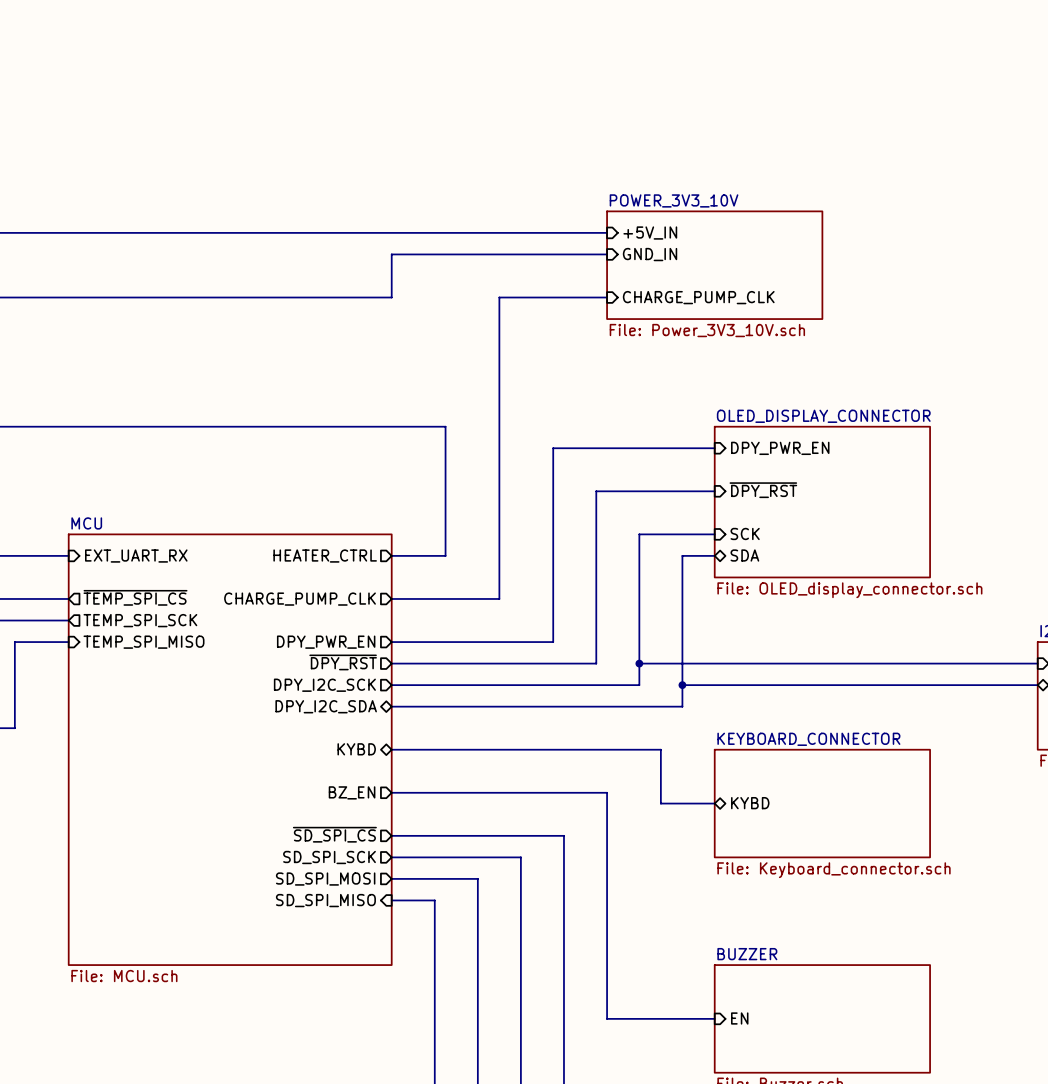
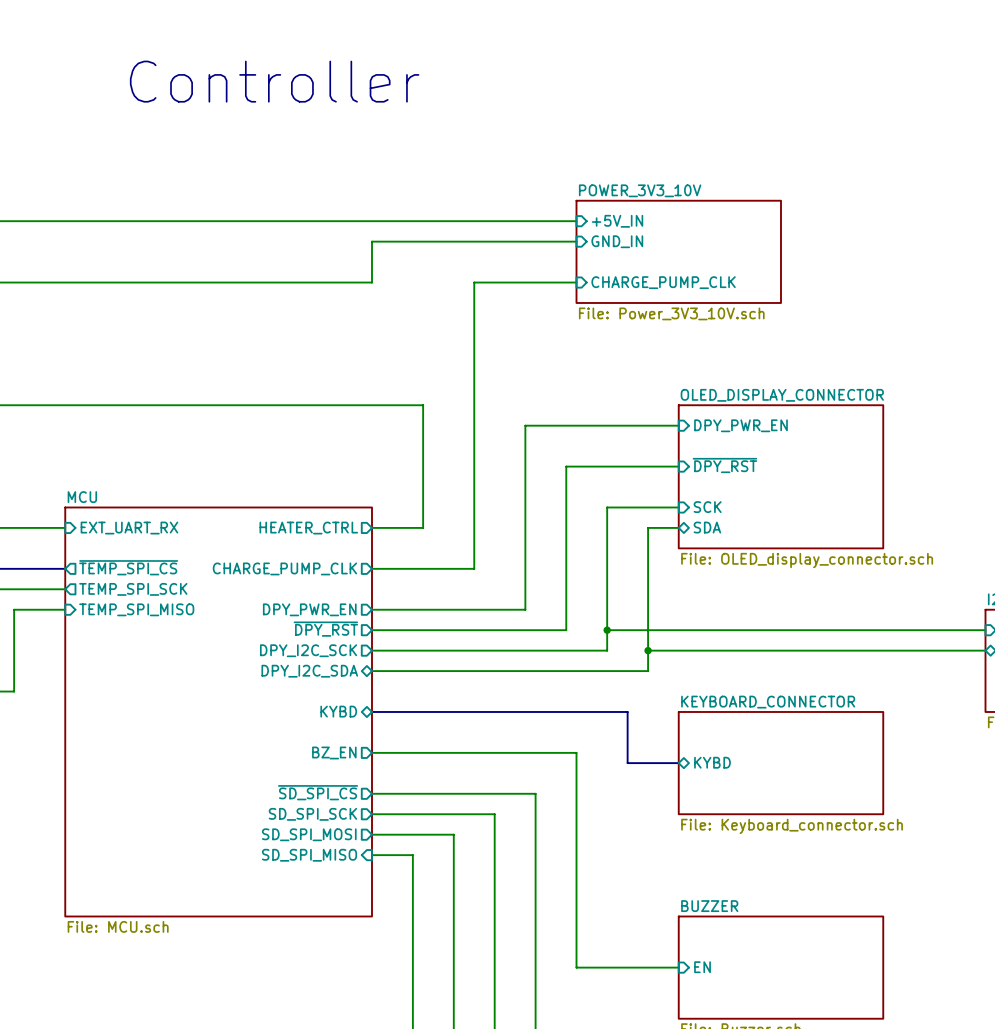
text: none -> Controller (274, 81)

